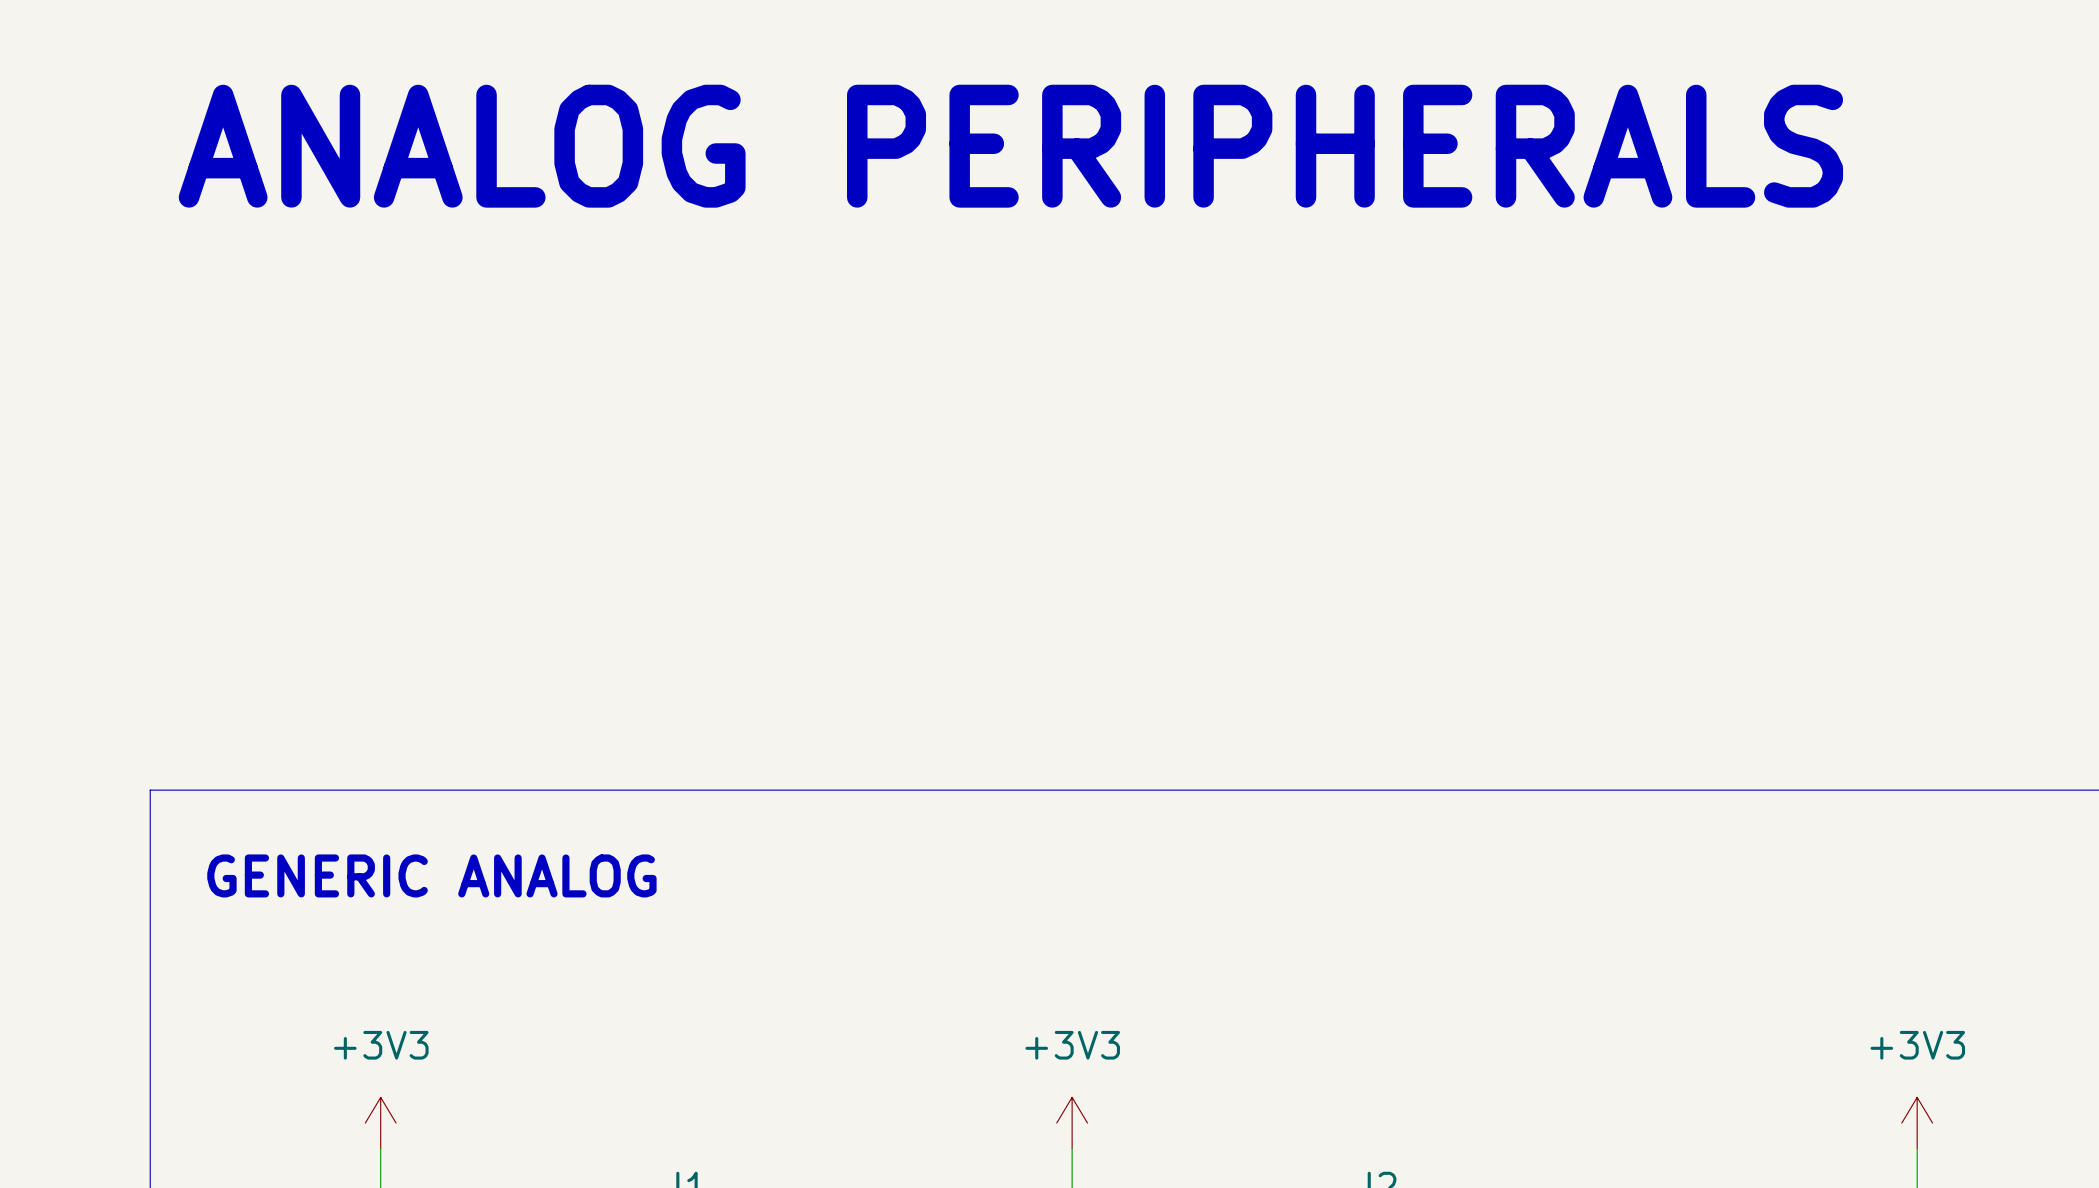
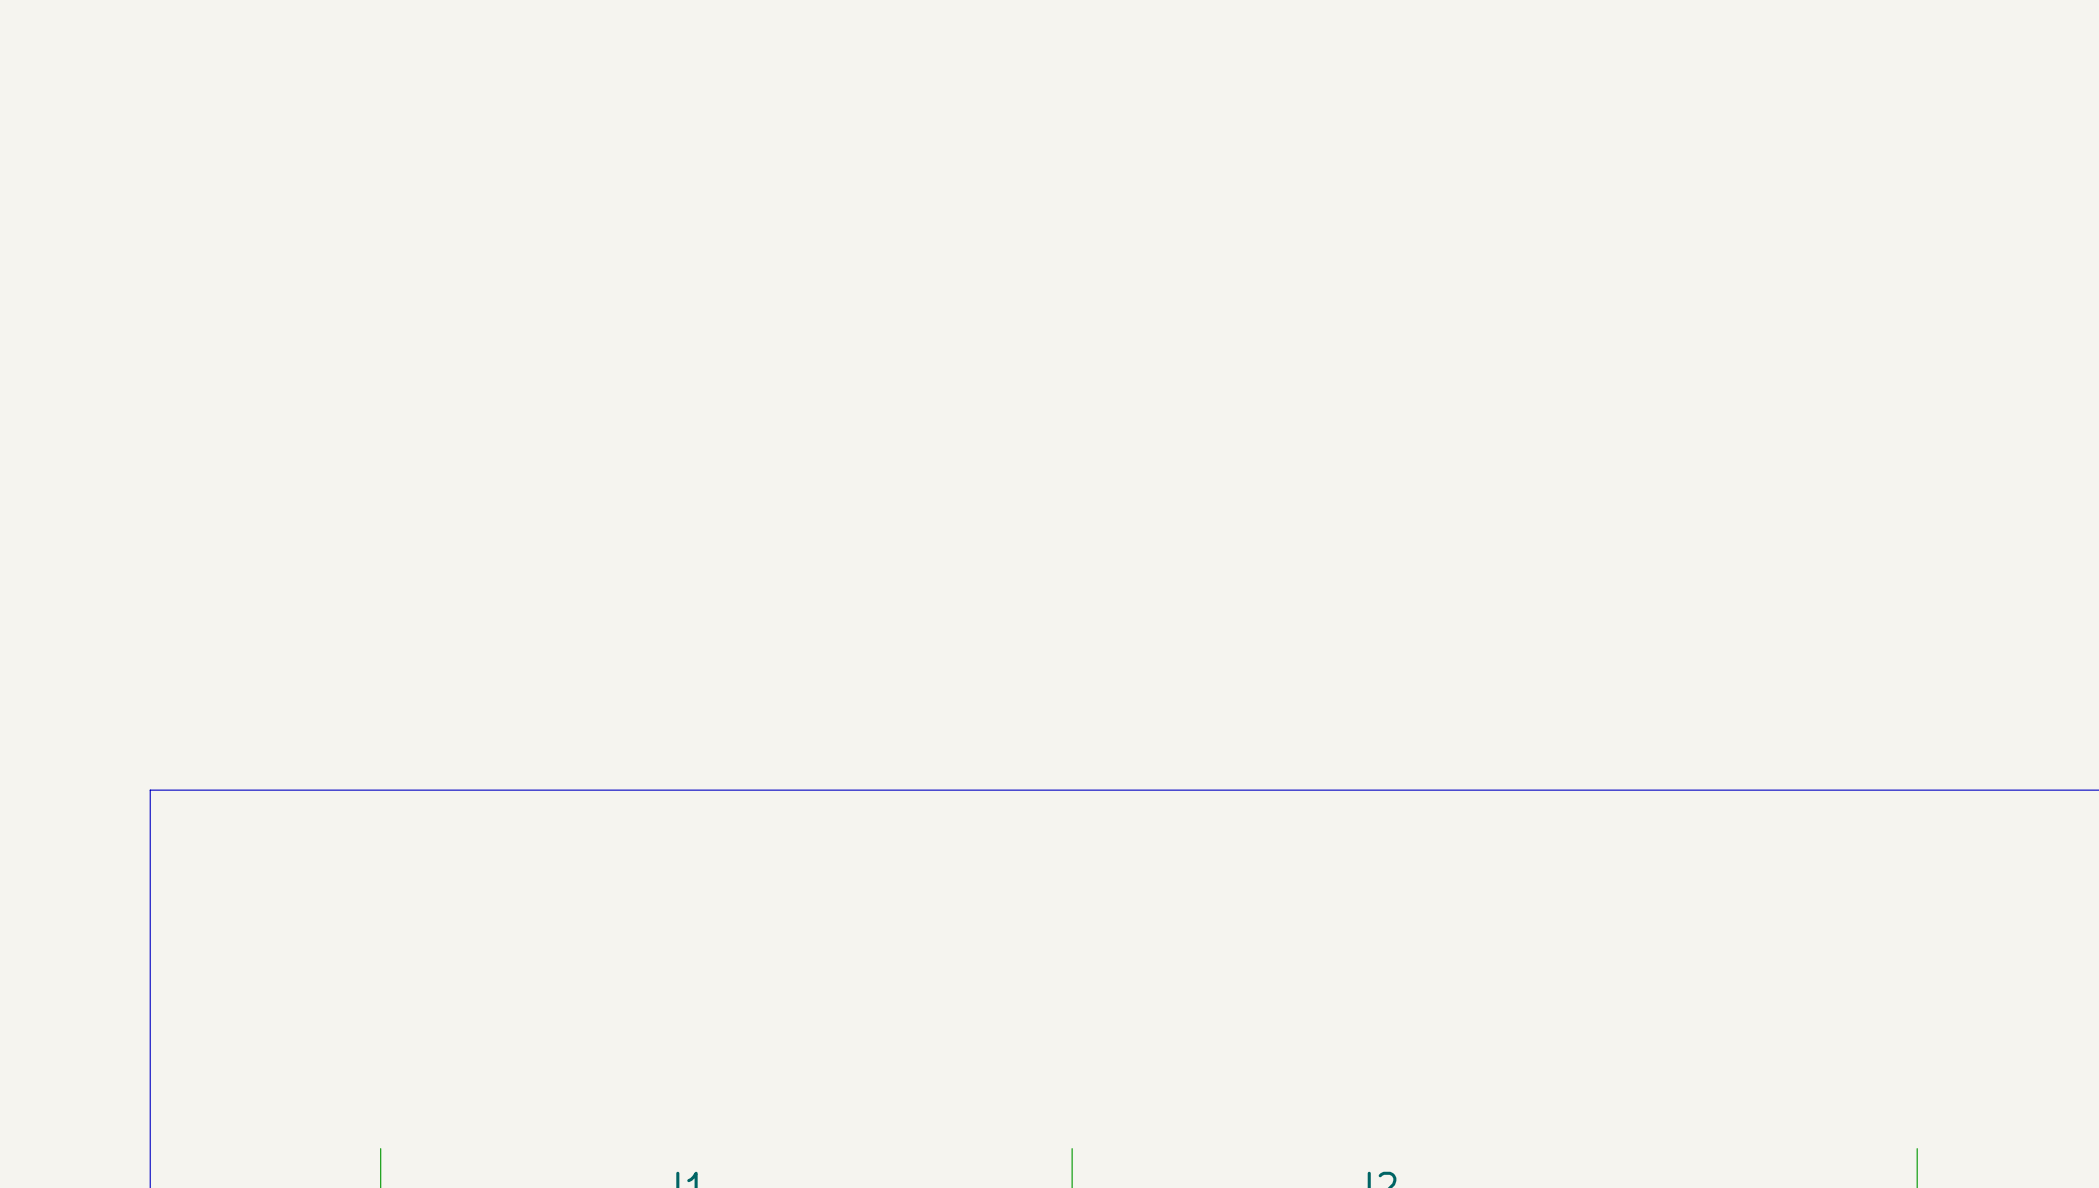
text: ANALOG PERIPHERALS (1010, 146) -> none
text: GENERIC ANALOG (431, 875) -> none
power symbol: +3V3 (380, 1123) -> none
power symbol: +3V3 (1072, 1123) -> none
power symbol: +3V3 (1917, 1123) -> none

